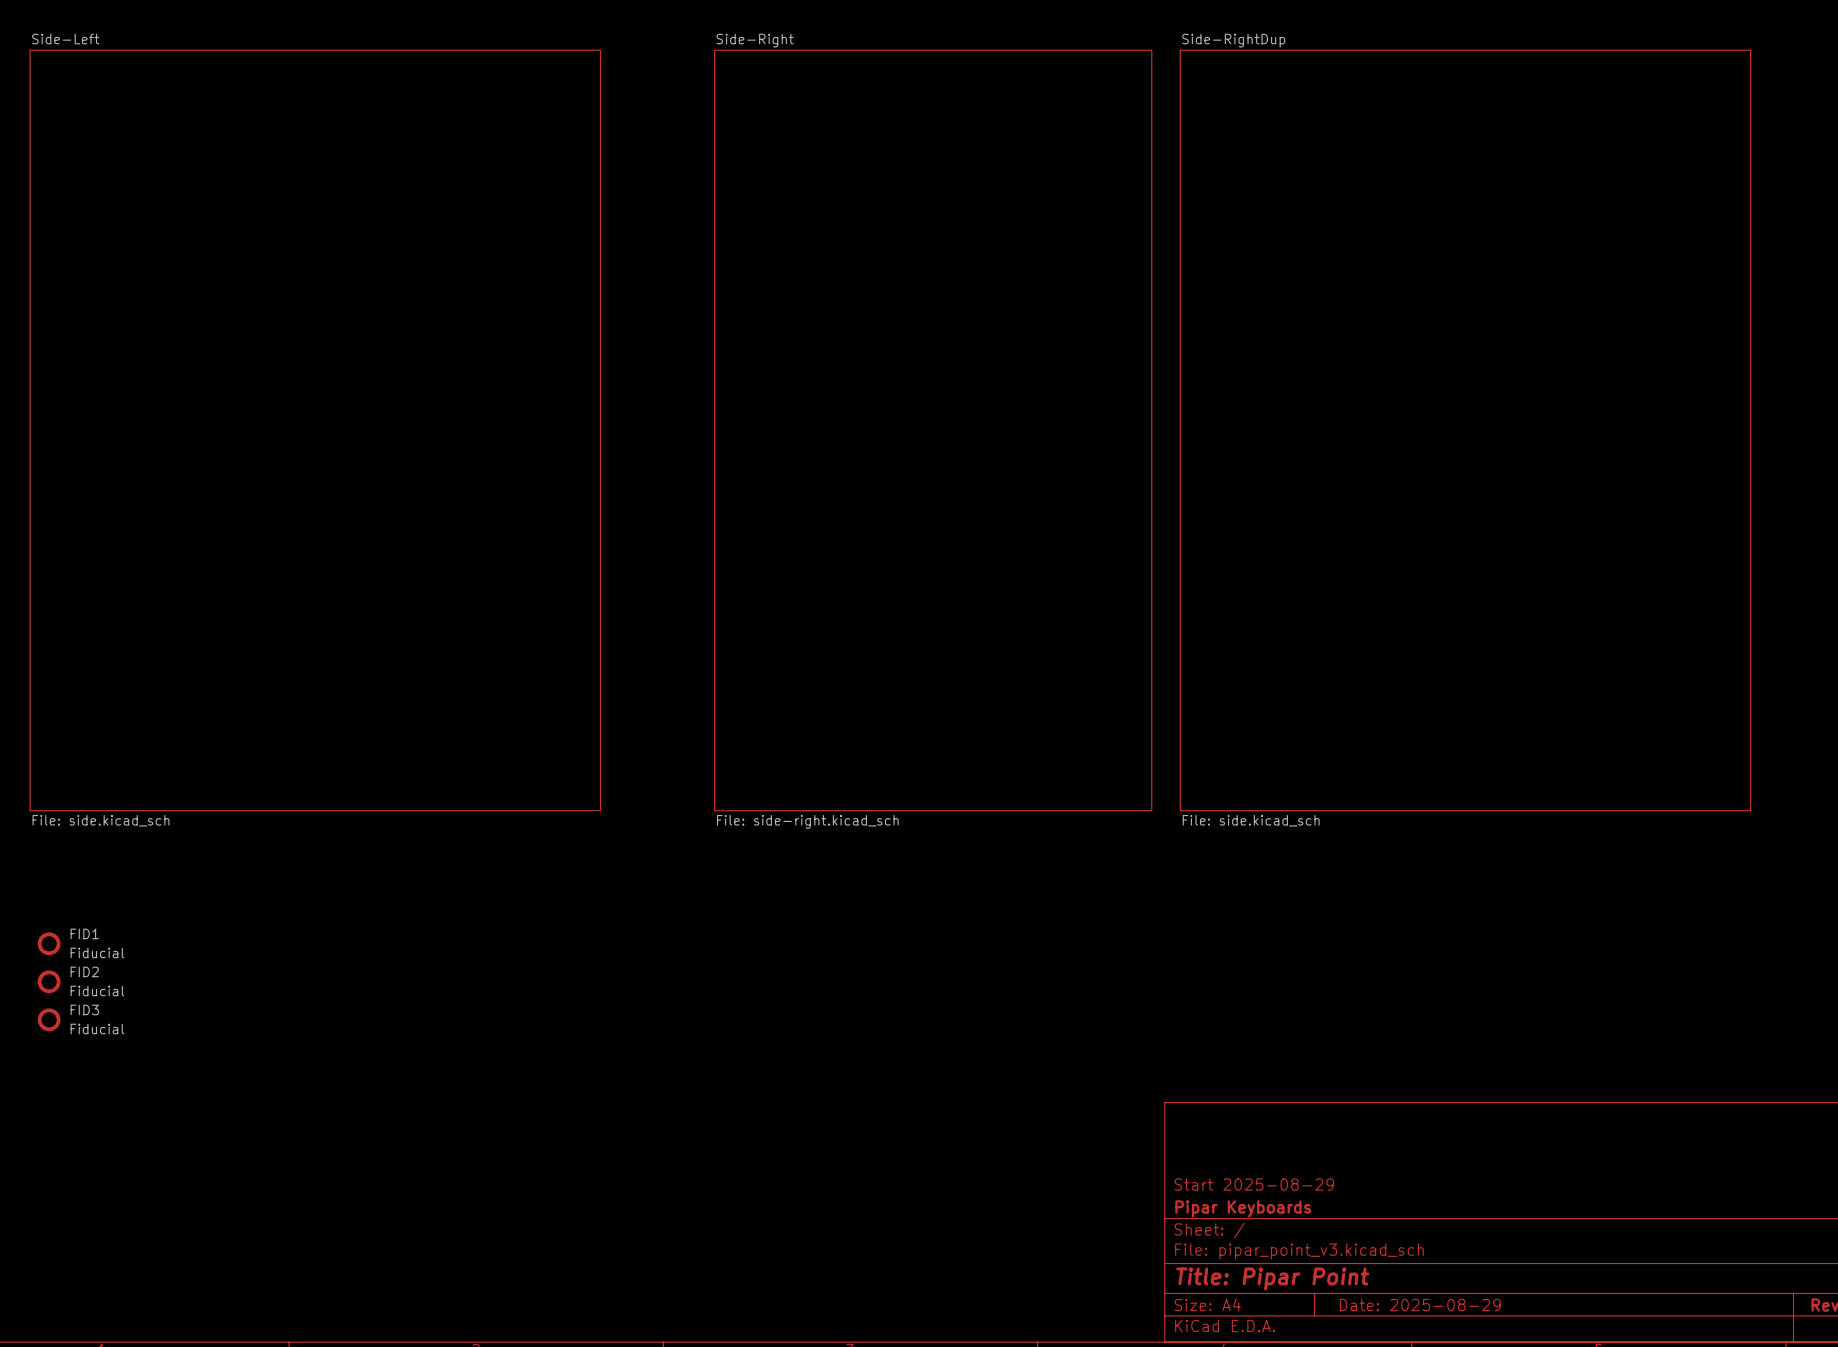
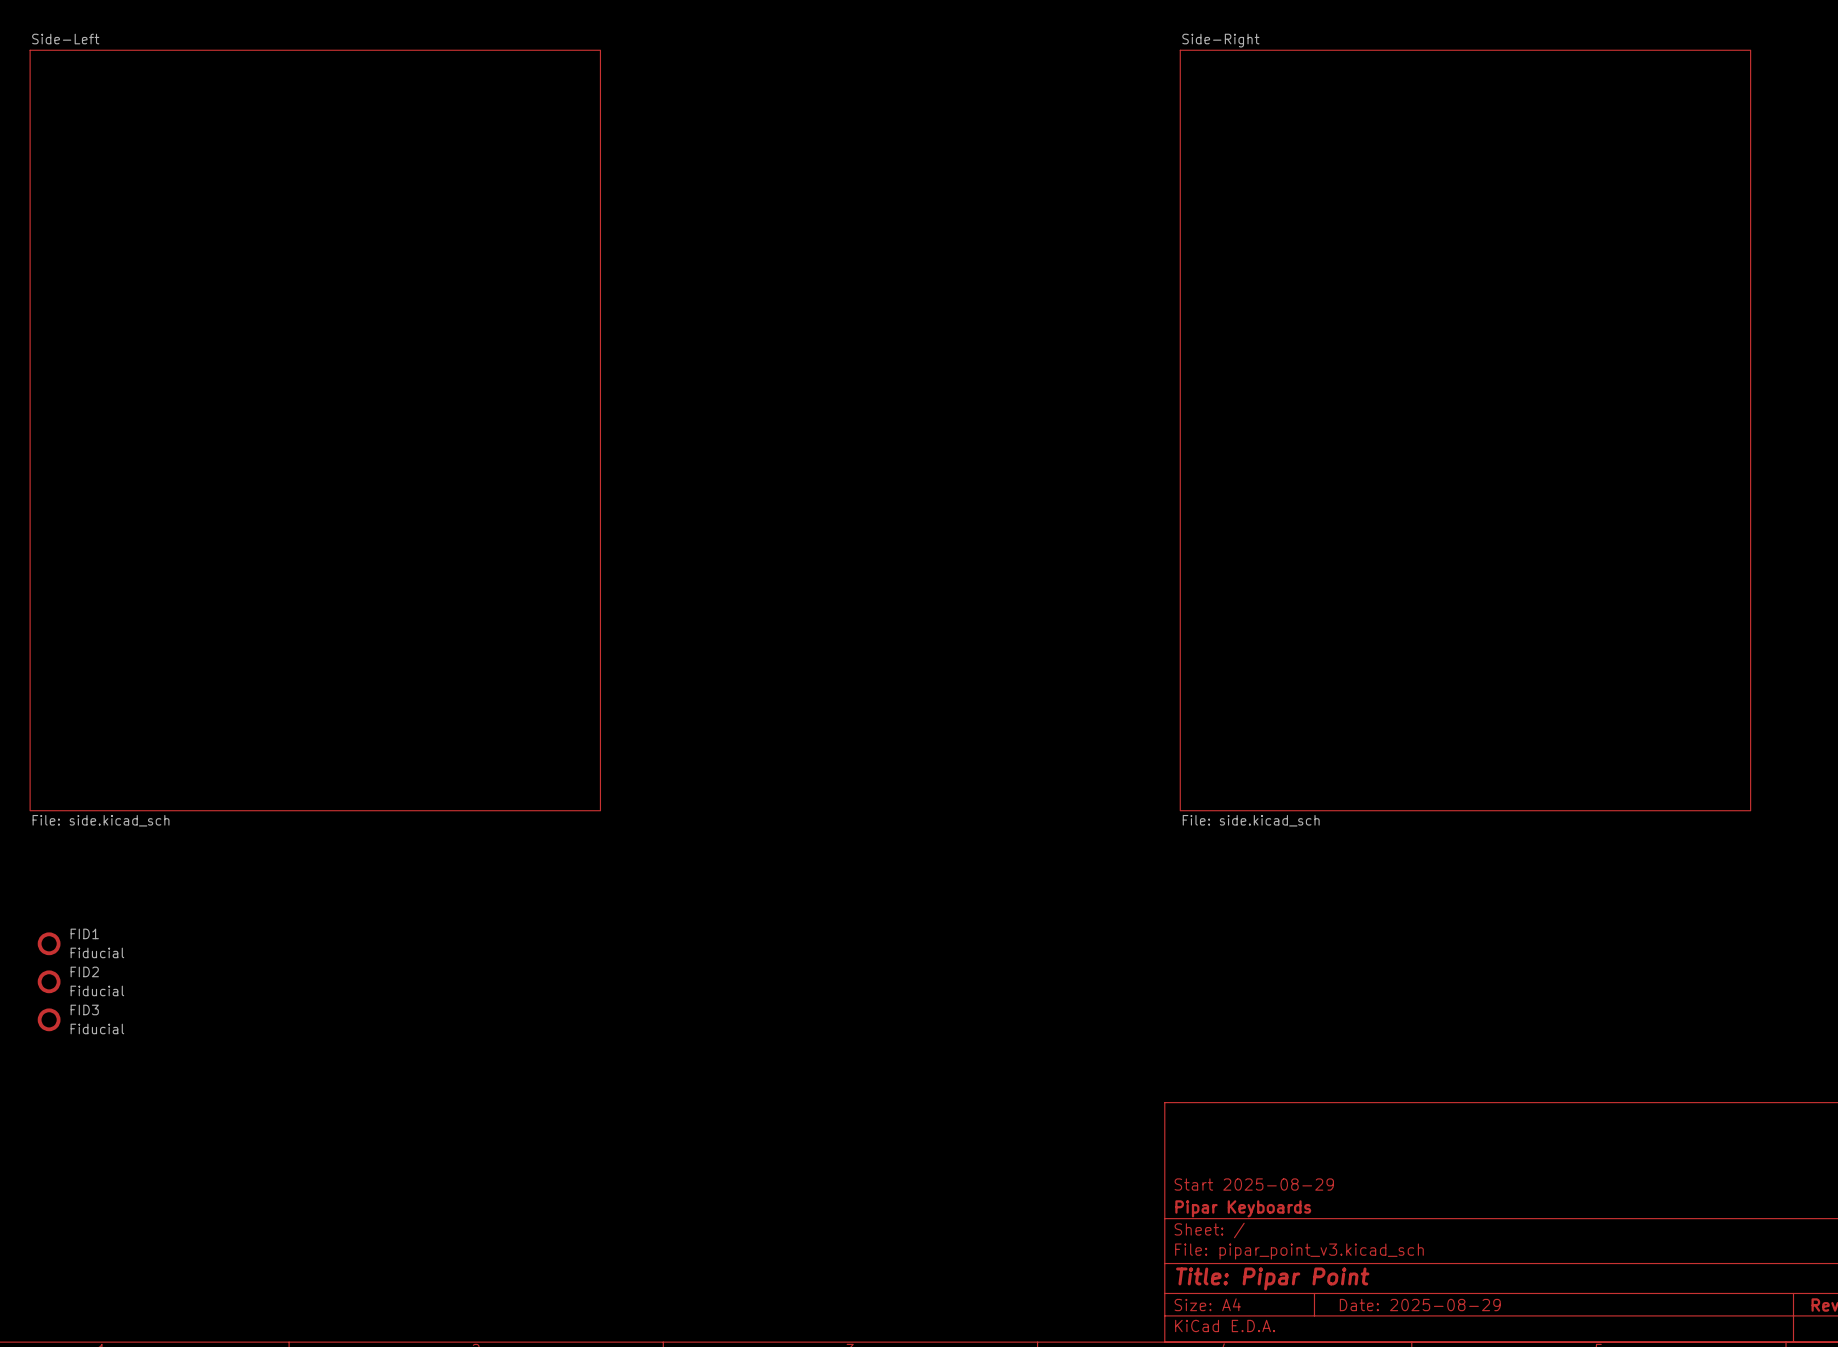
sheet Side-RightDup name: Side-RightDup (1233, 40) -> Side-Right (1220, 40)
sheet Side-Right: File: side-right.kicad_sch (933, 430) -> none

